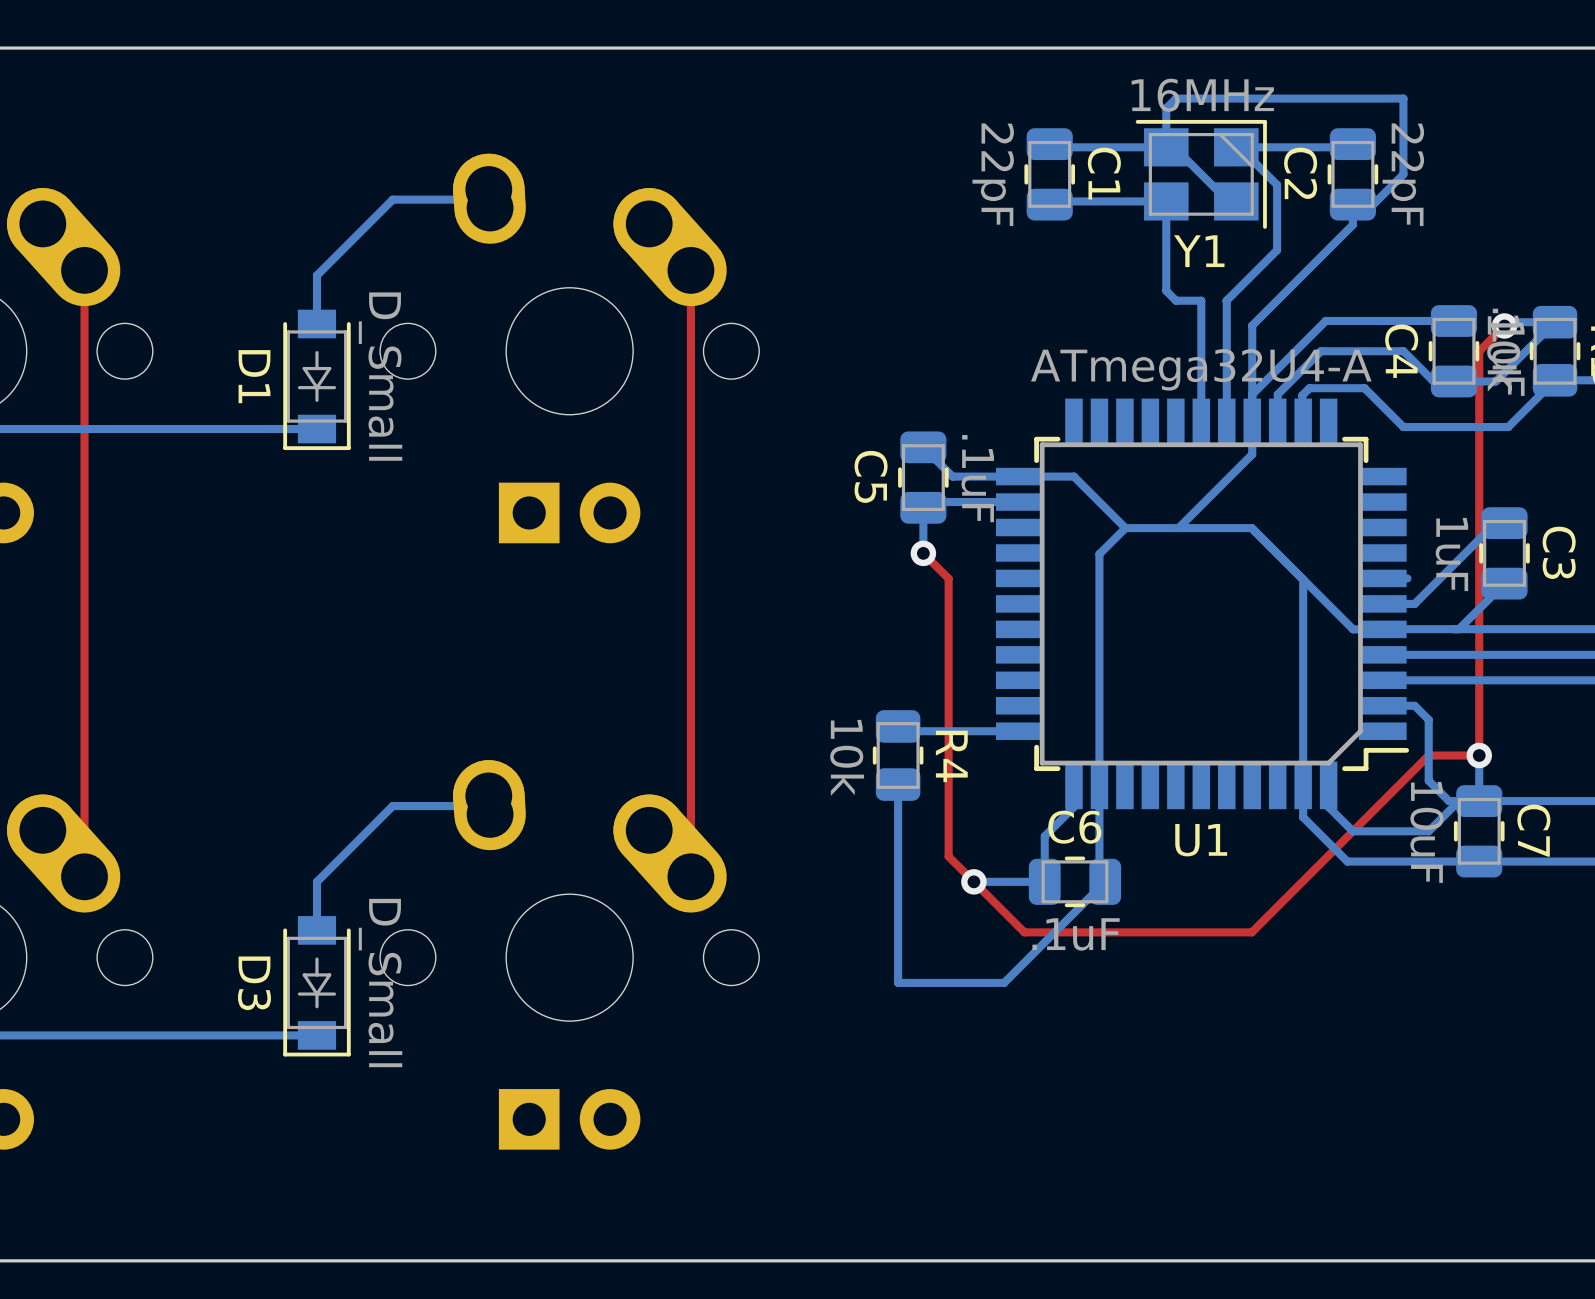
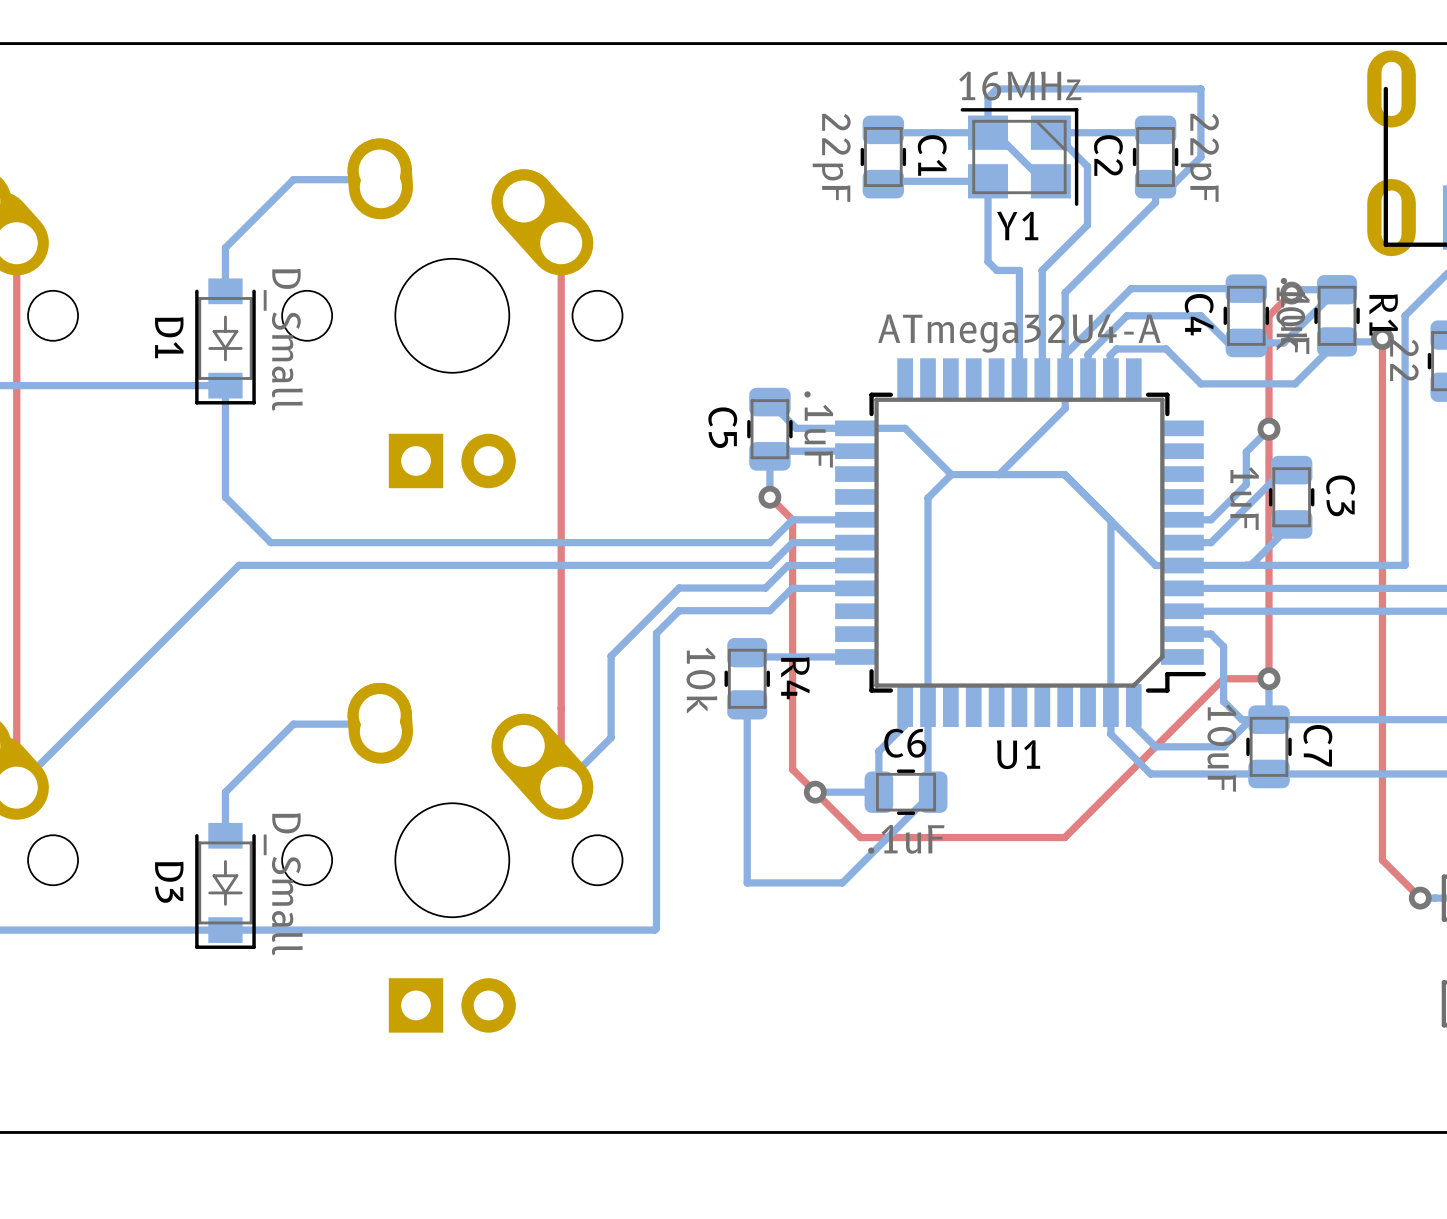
bottom track: none -> (225, 385) (225, 497) (270, 542) (769, 542) (792, 519) (856, 519)
bottom track: none -> (1268, 429) (1246, 451) (1246, 484) (1211, 519) (1204, 519)
via: none -> (1268, 429)
bottom track: none -> (856, 542) (792, 542) (769, 565) (239, 565) (16, 787)
bottom track: none -> (856, 565) (788, 565) (765, 588) (679, 588) (611, 656) (611, 737) (561, 787)
bottom track: none -> (856, 588) (792, 588) (769, 610) (679, 610) (656, 633) (656, 928) (654, 930) (225, 930)

